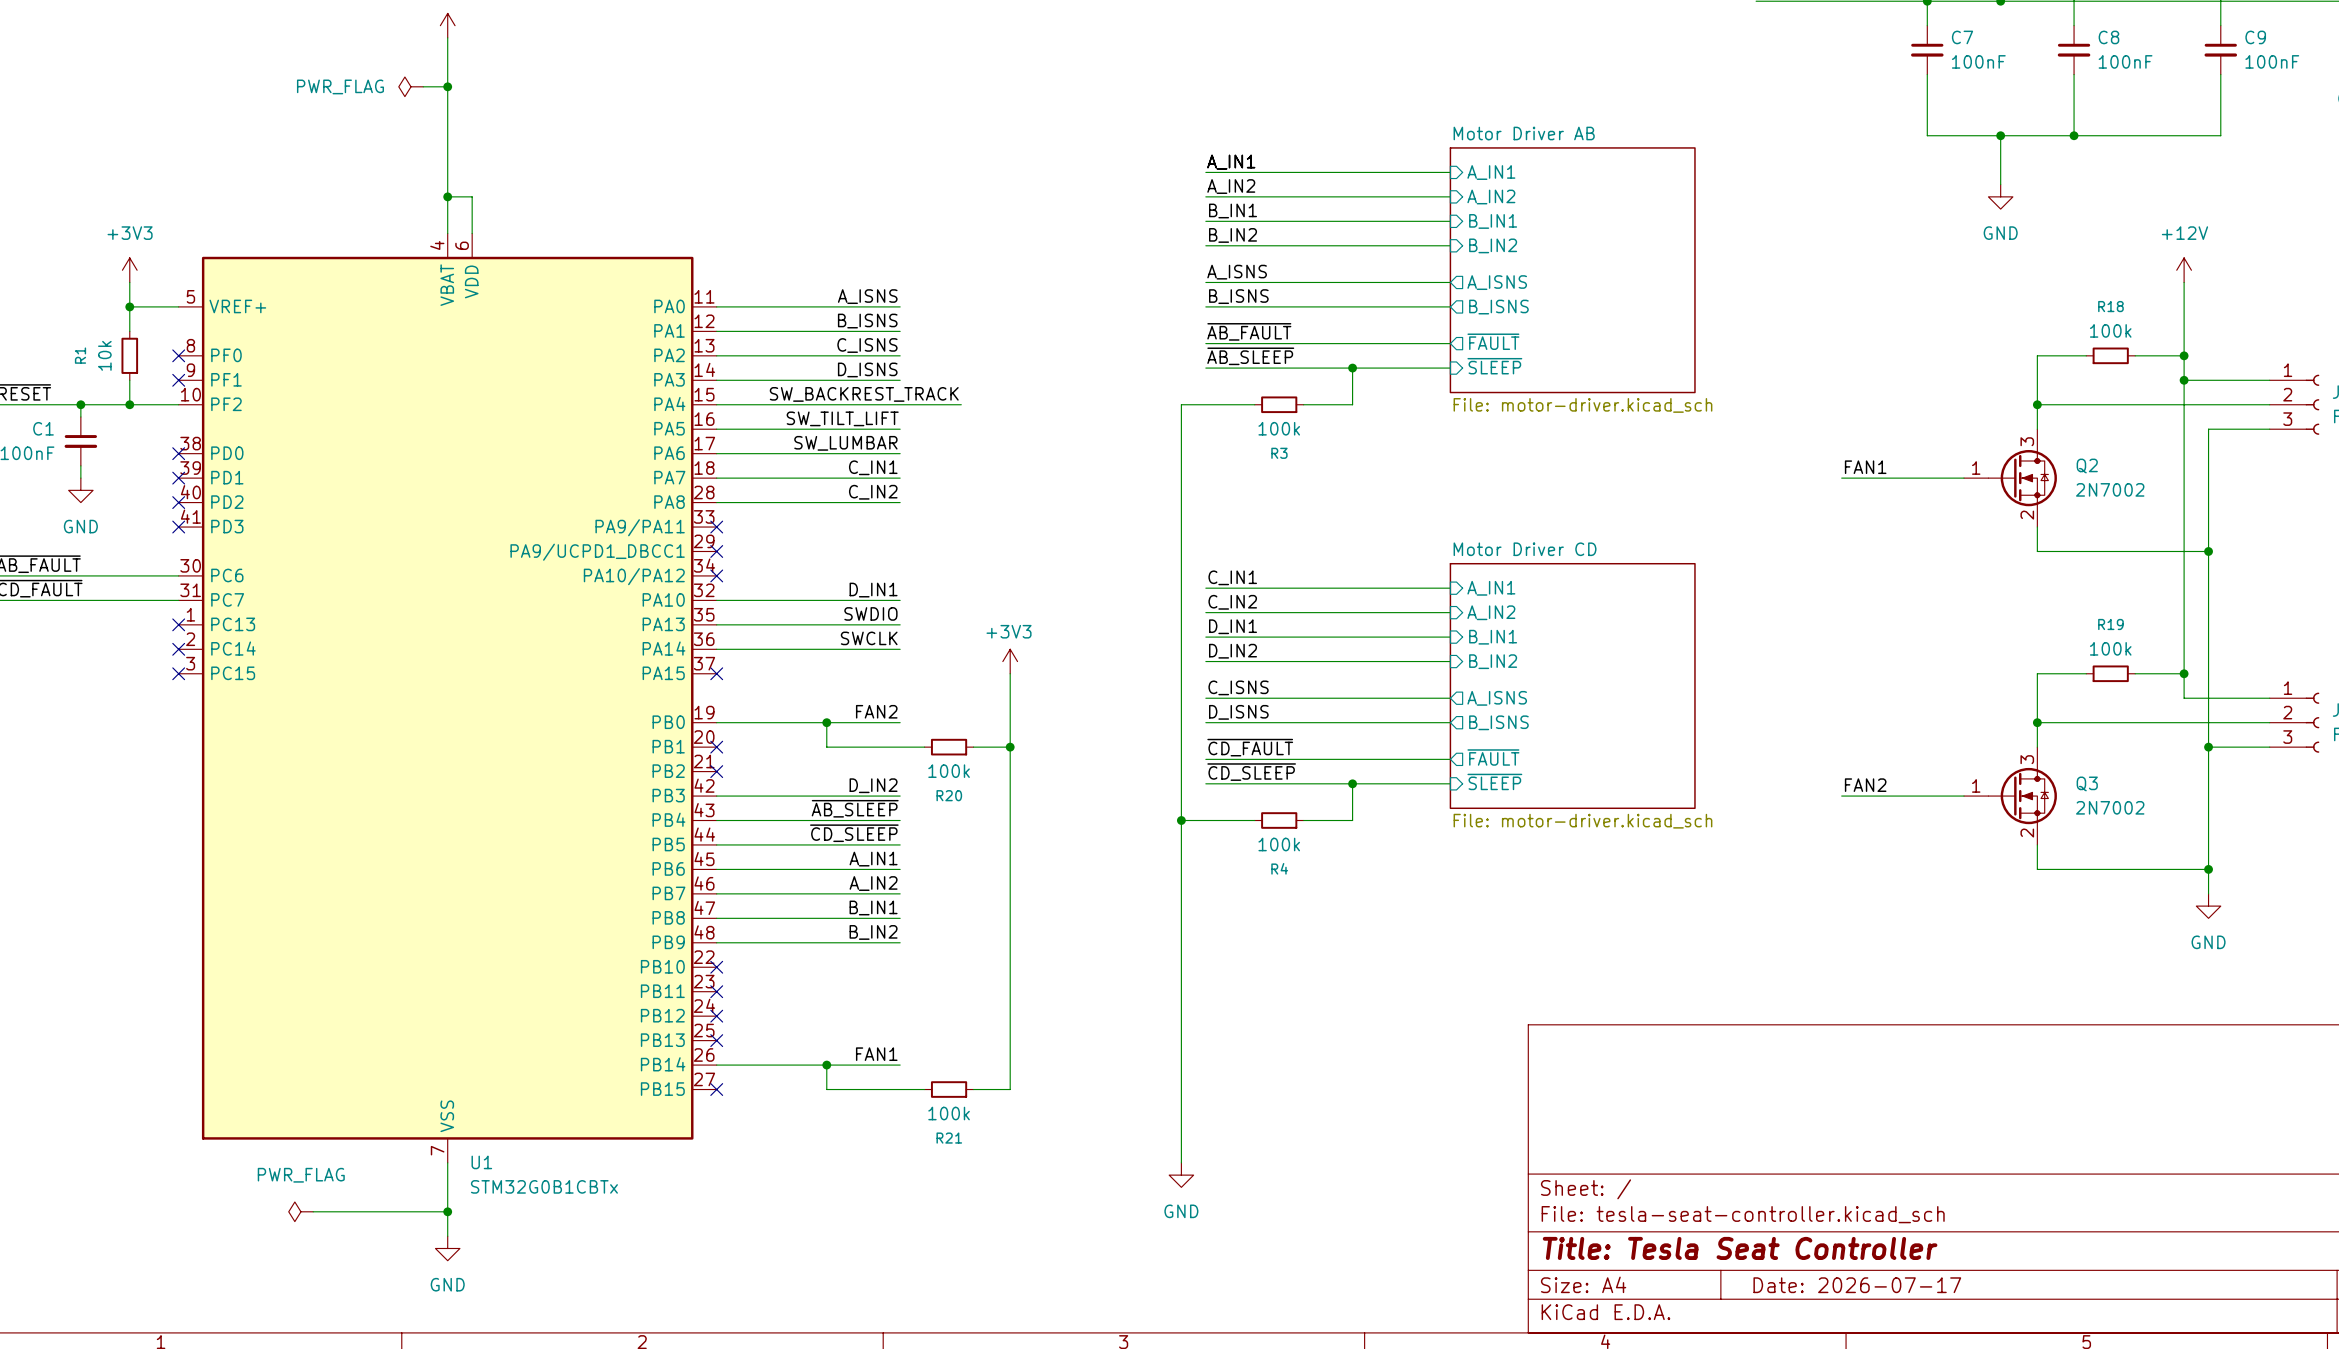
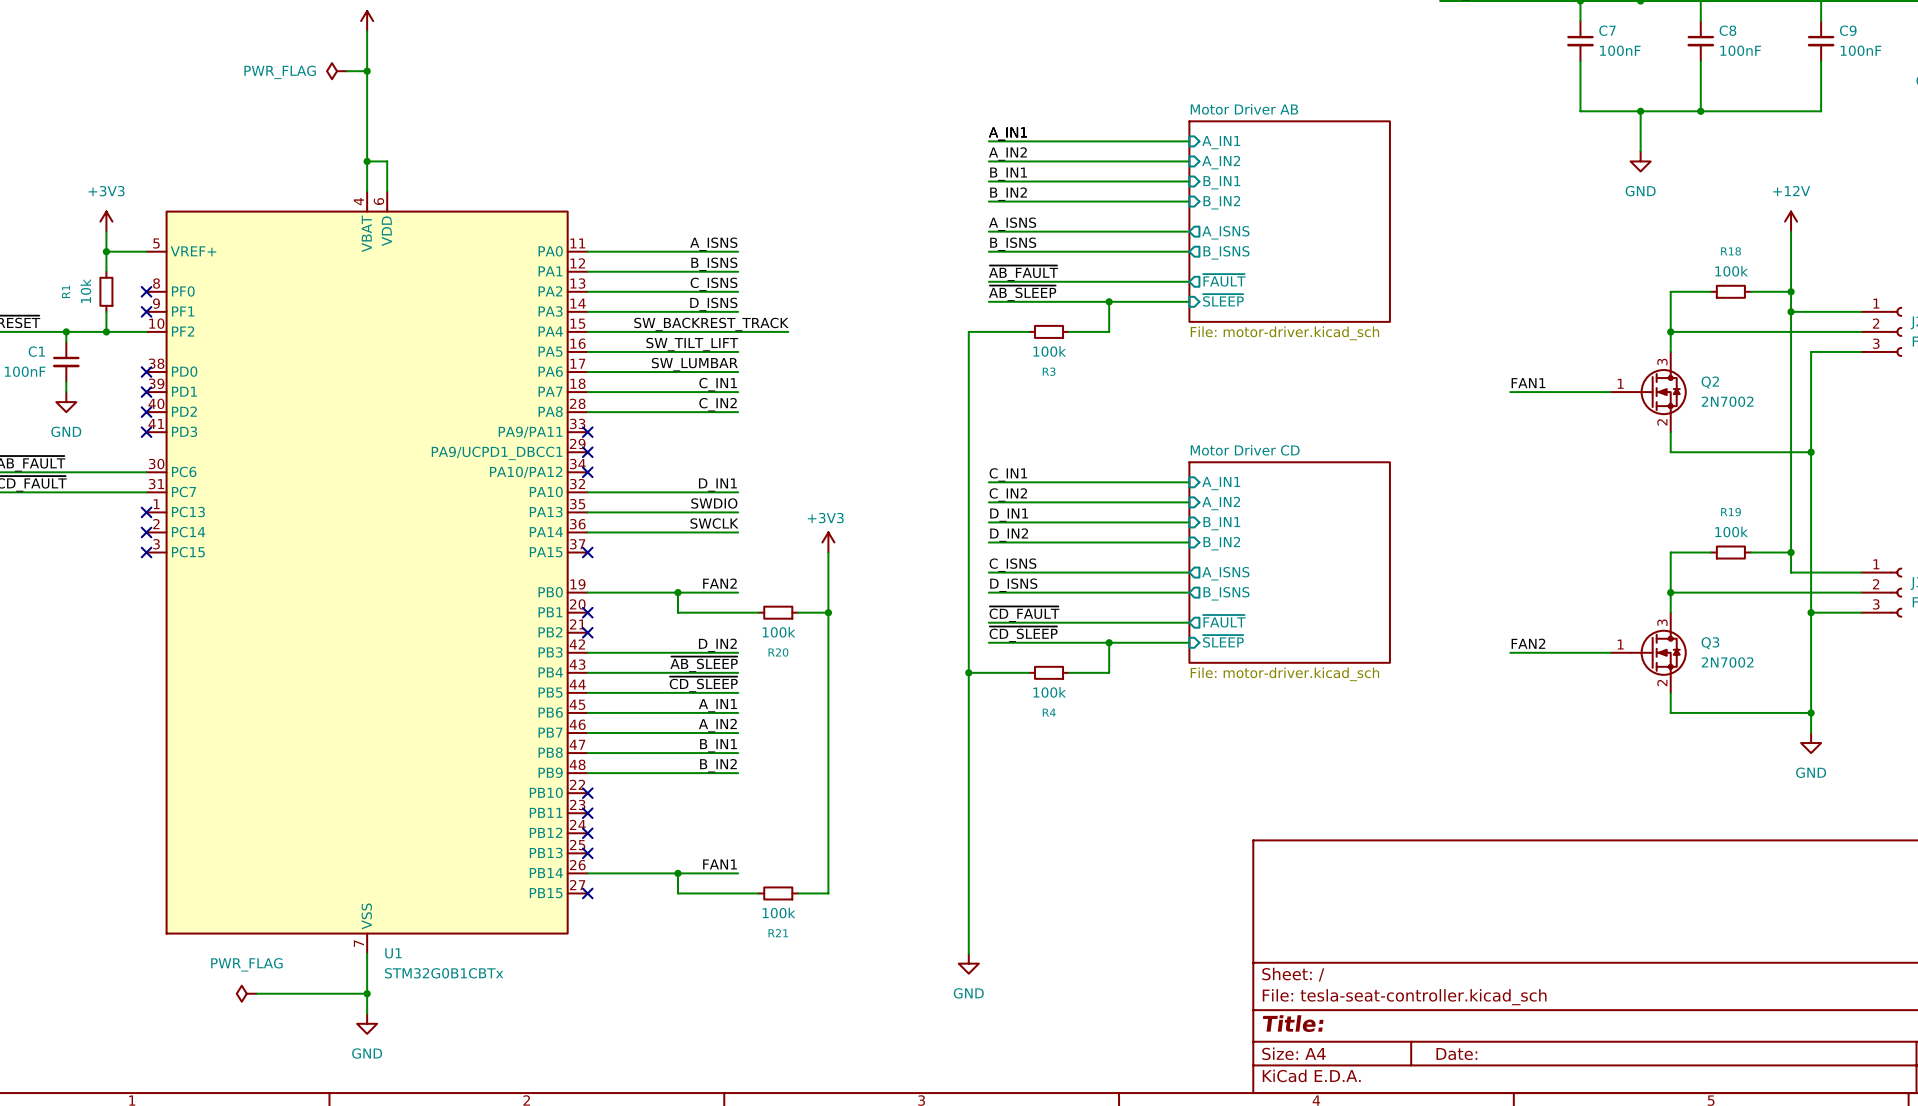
title block: Title: Tesla Seat Controller (1740, 1248) -> Title: (1293, 1023)
title block: Date: 2026-07-17 (1857, 1285) -> Date: (1456, 1054)

